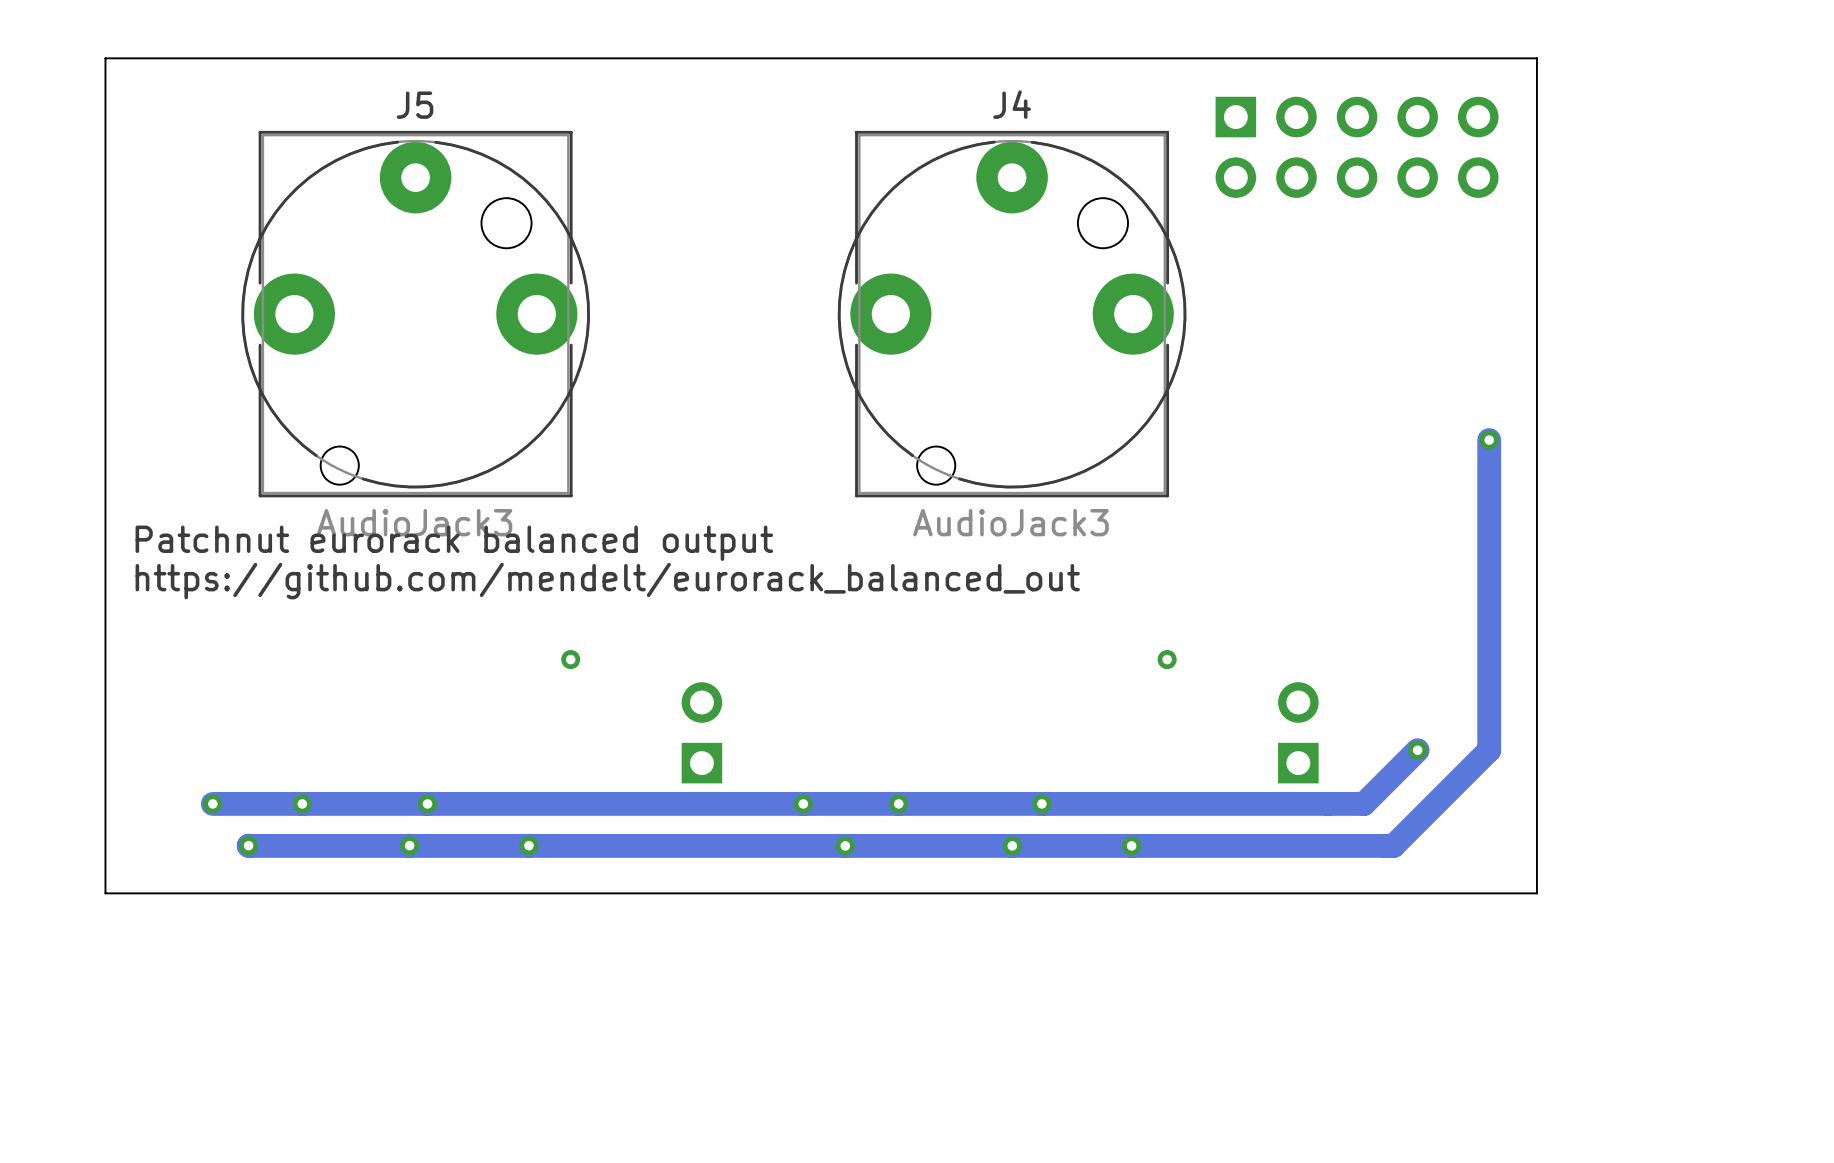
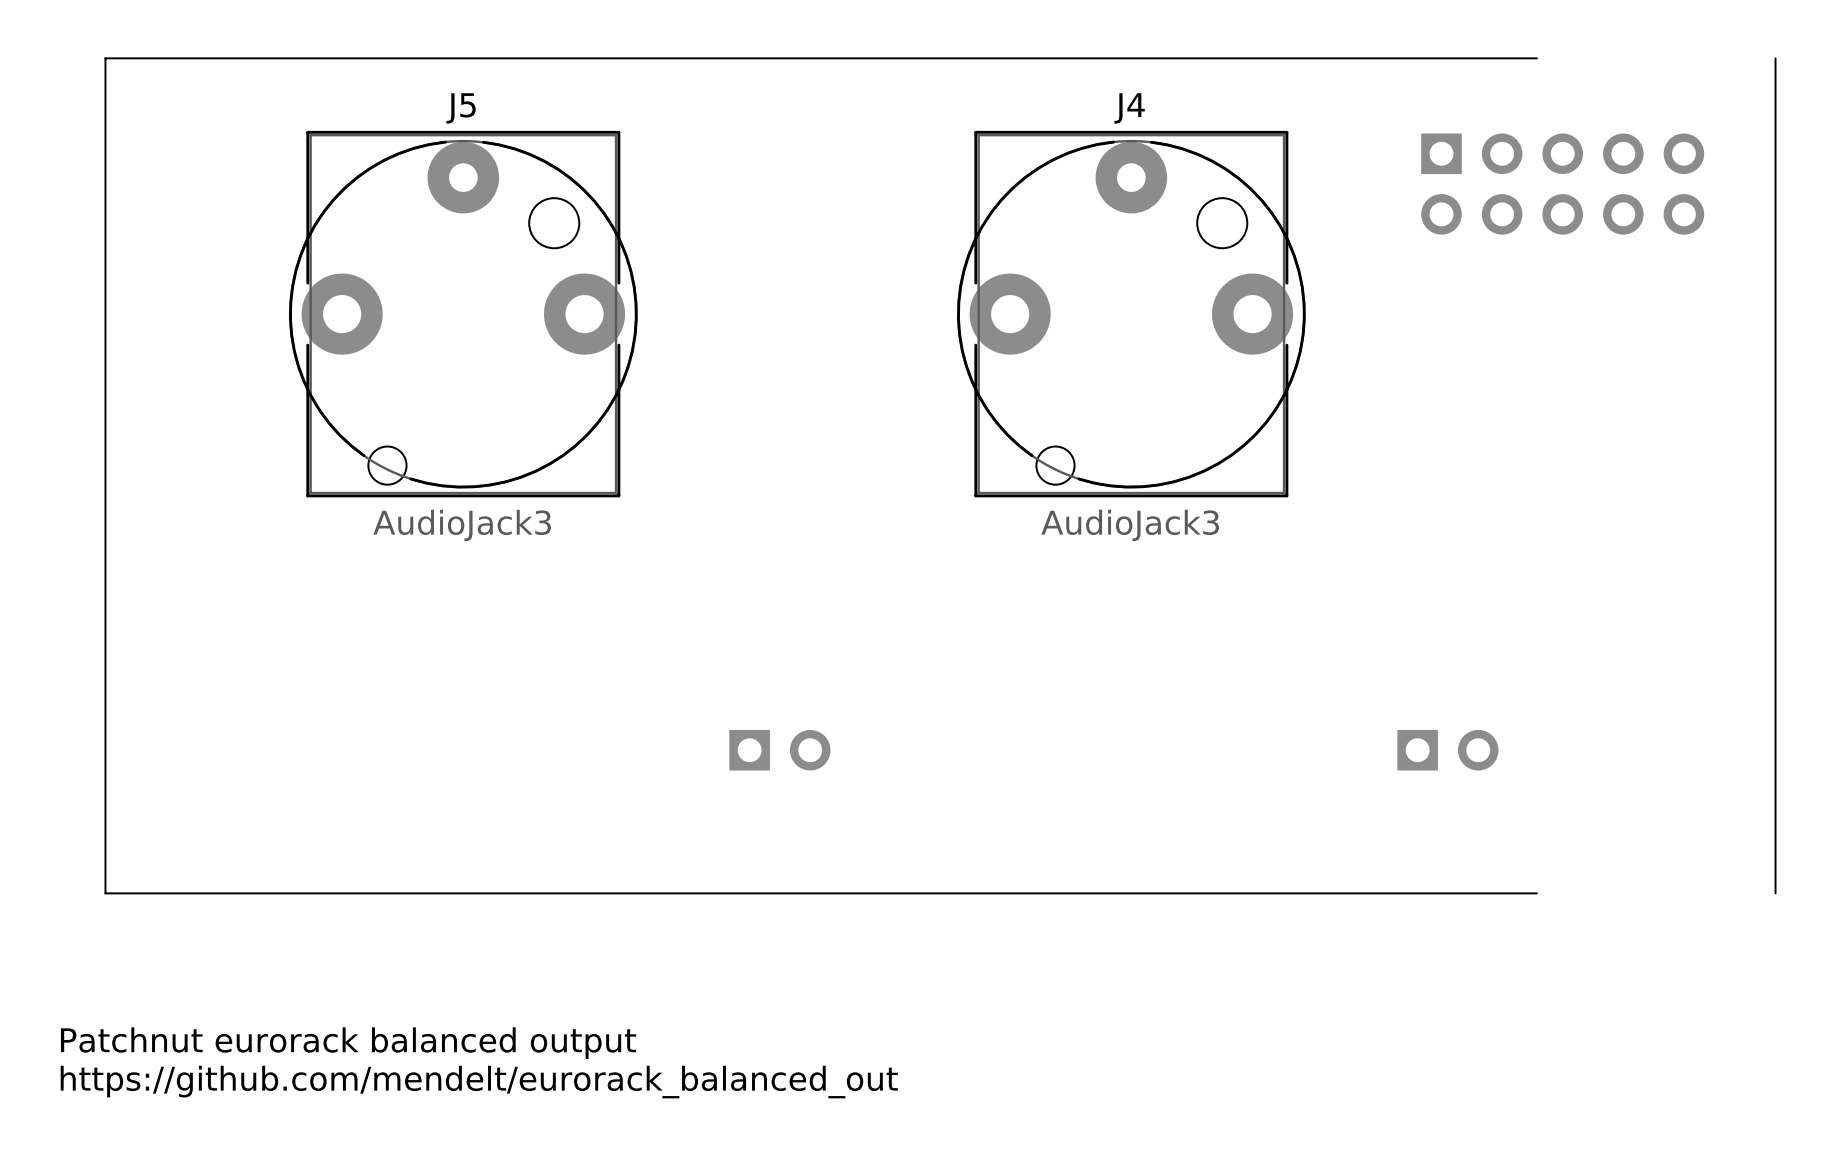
board edge: (1536, 58) (1536, 893) -> (1775, 58) (1775, 893)
part position: (1357, 147) -> (1562, 184)
J5 position: (415, 314) -> (463, 314)
J4 position: (1012, 314) -> (1131, 314)
track: (1489, 440) (1489, 750) (1393, 845) (248, 845) -> none
via: (1489, 440) -> none
text position: Patchnut eurorack balanced output (454, 543) -> Patchnut eurorack balanced output (348, 1043)
text position: https://github.com/mendelt/eurorack_balanced_out (607, 581) -> https://github.com/mendelt/eurorack_balanced_out (479, 1082)
via: (570, 659) -> none
via: (1167, 659) -> none
part rotation: 0° (701, 732) -> 90° clockwise (779, 750)
part position: (701, 732) -> (779, 750)
part rotation: 0° (1298, 732) -> 90° clockwise (1447, 750)
part position: (1298, 732) -> (1447, 750)
track: (1417, 750) (1363, 803) (212, 803) -> none
via: (1417, 750) -> none
via: (212, 803) -> none
via: (302, 803) -> none
via: (427, 803) -> none
via: (803, 803) -> none
via: (898, 803) -> none
via: (1041, 803) -> none
via: (248, 845) -> none
via: (409, 845) -> none
via: (528, 845) -> none
via: (845, 845) -> none
via: (1012, 845) -> none
via: (1131, 845) -> none

